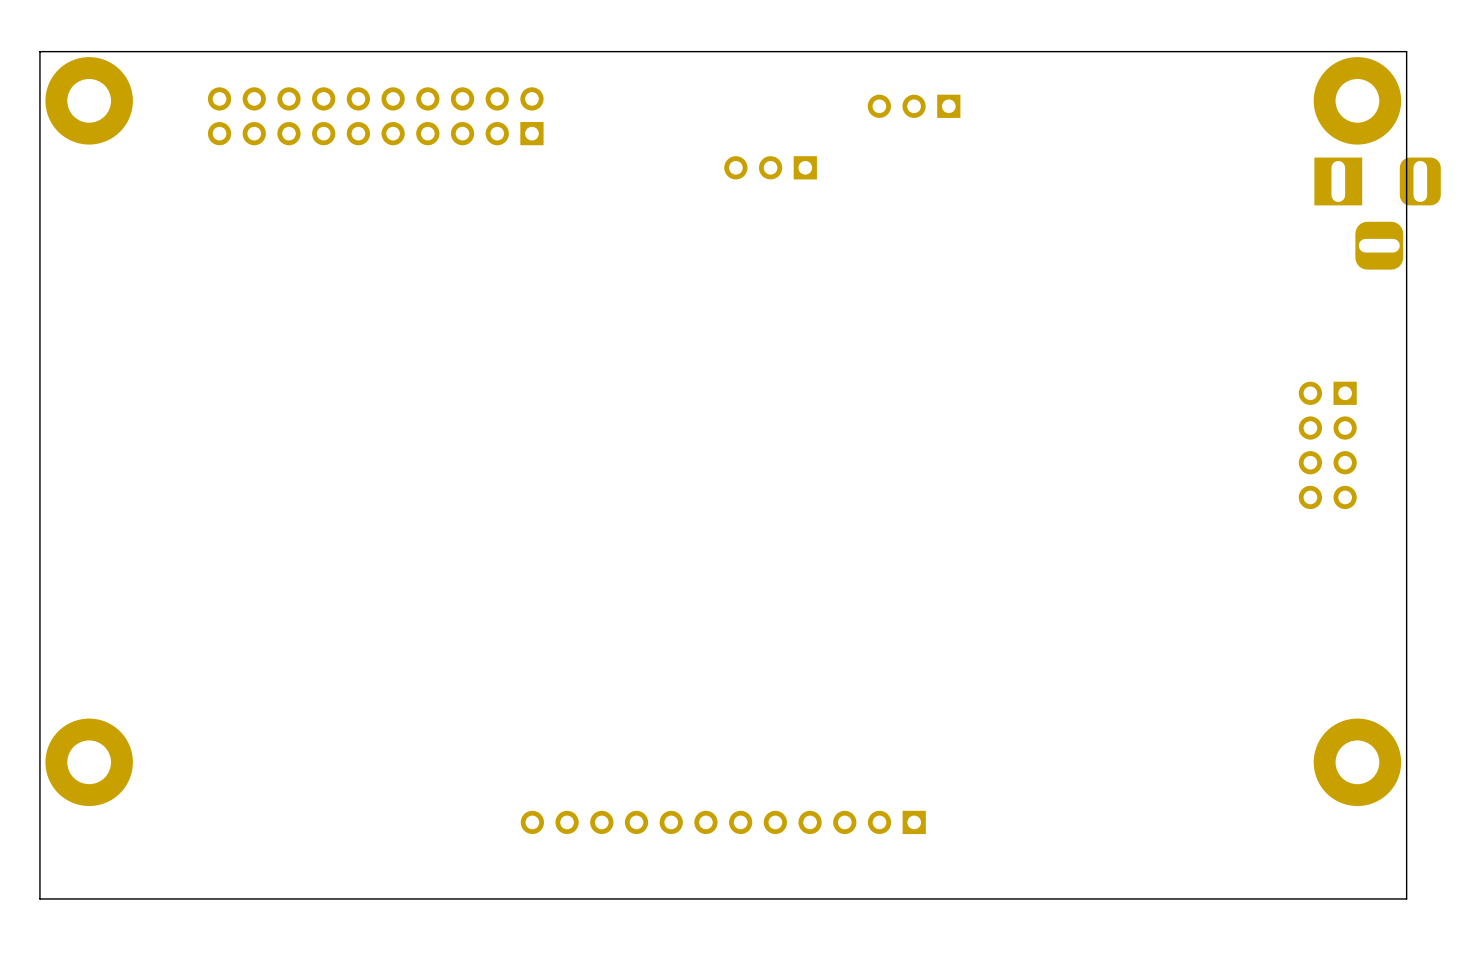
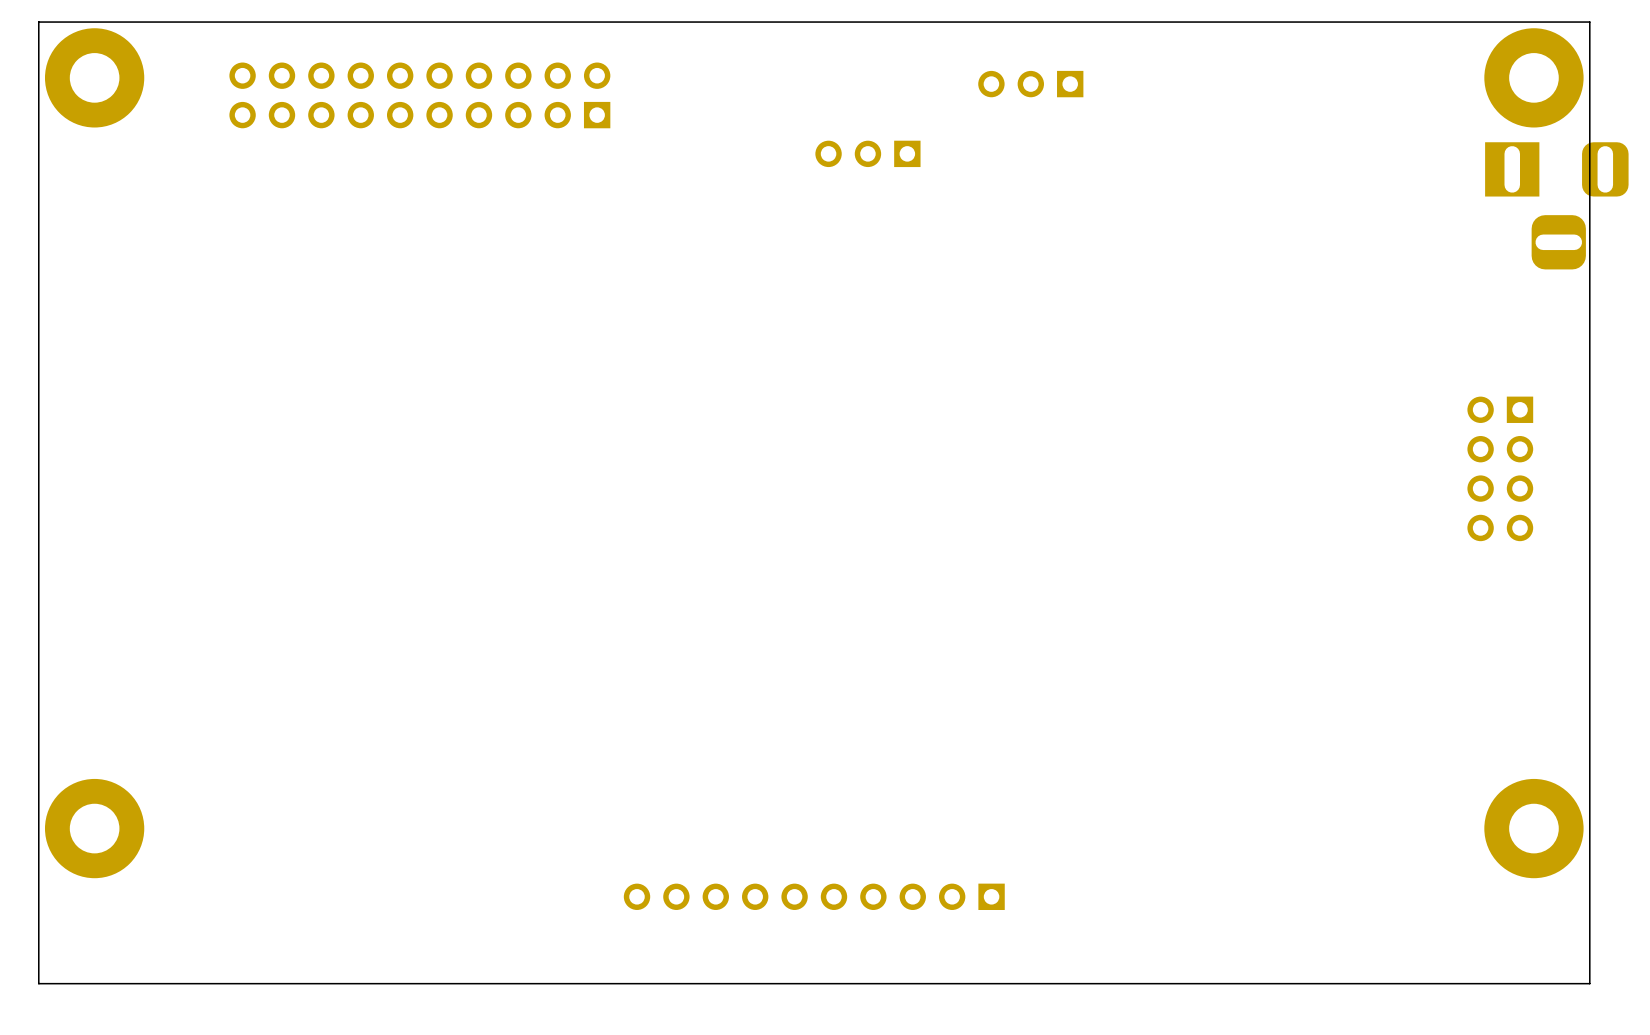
part footprint: [520, 810, 926, 835] -> [623, 883, 1005, 910]

